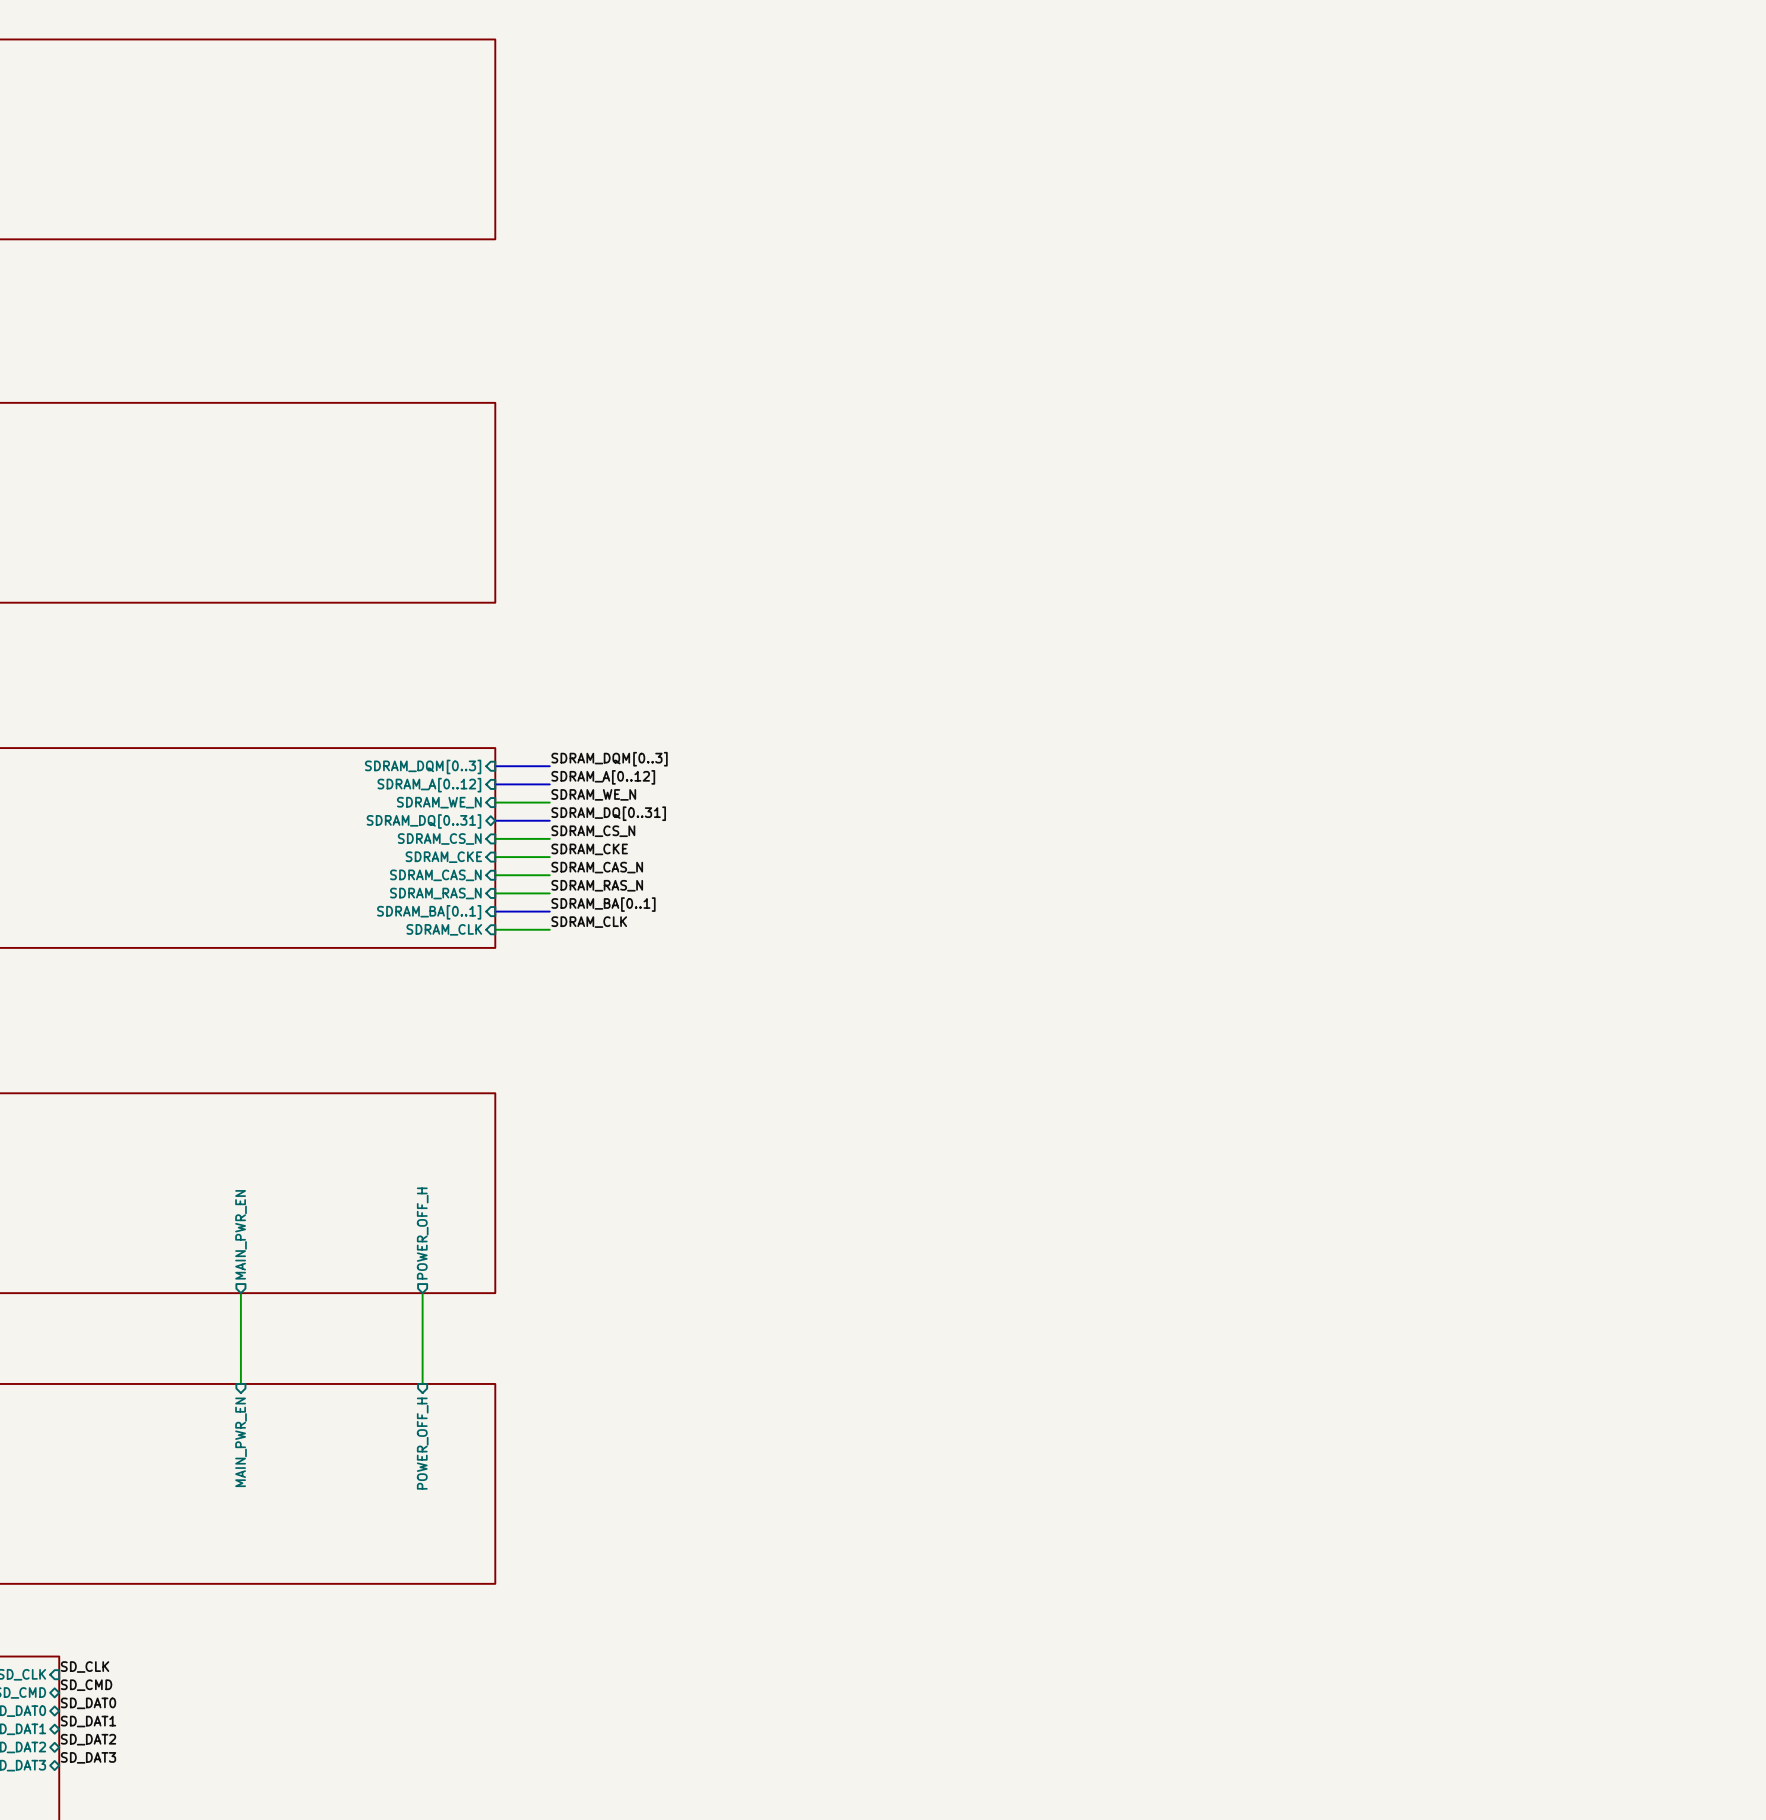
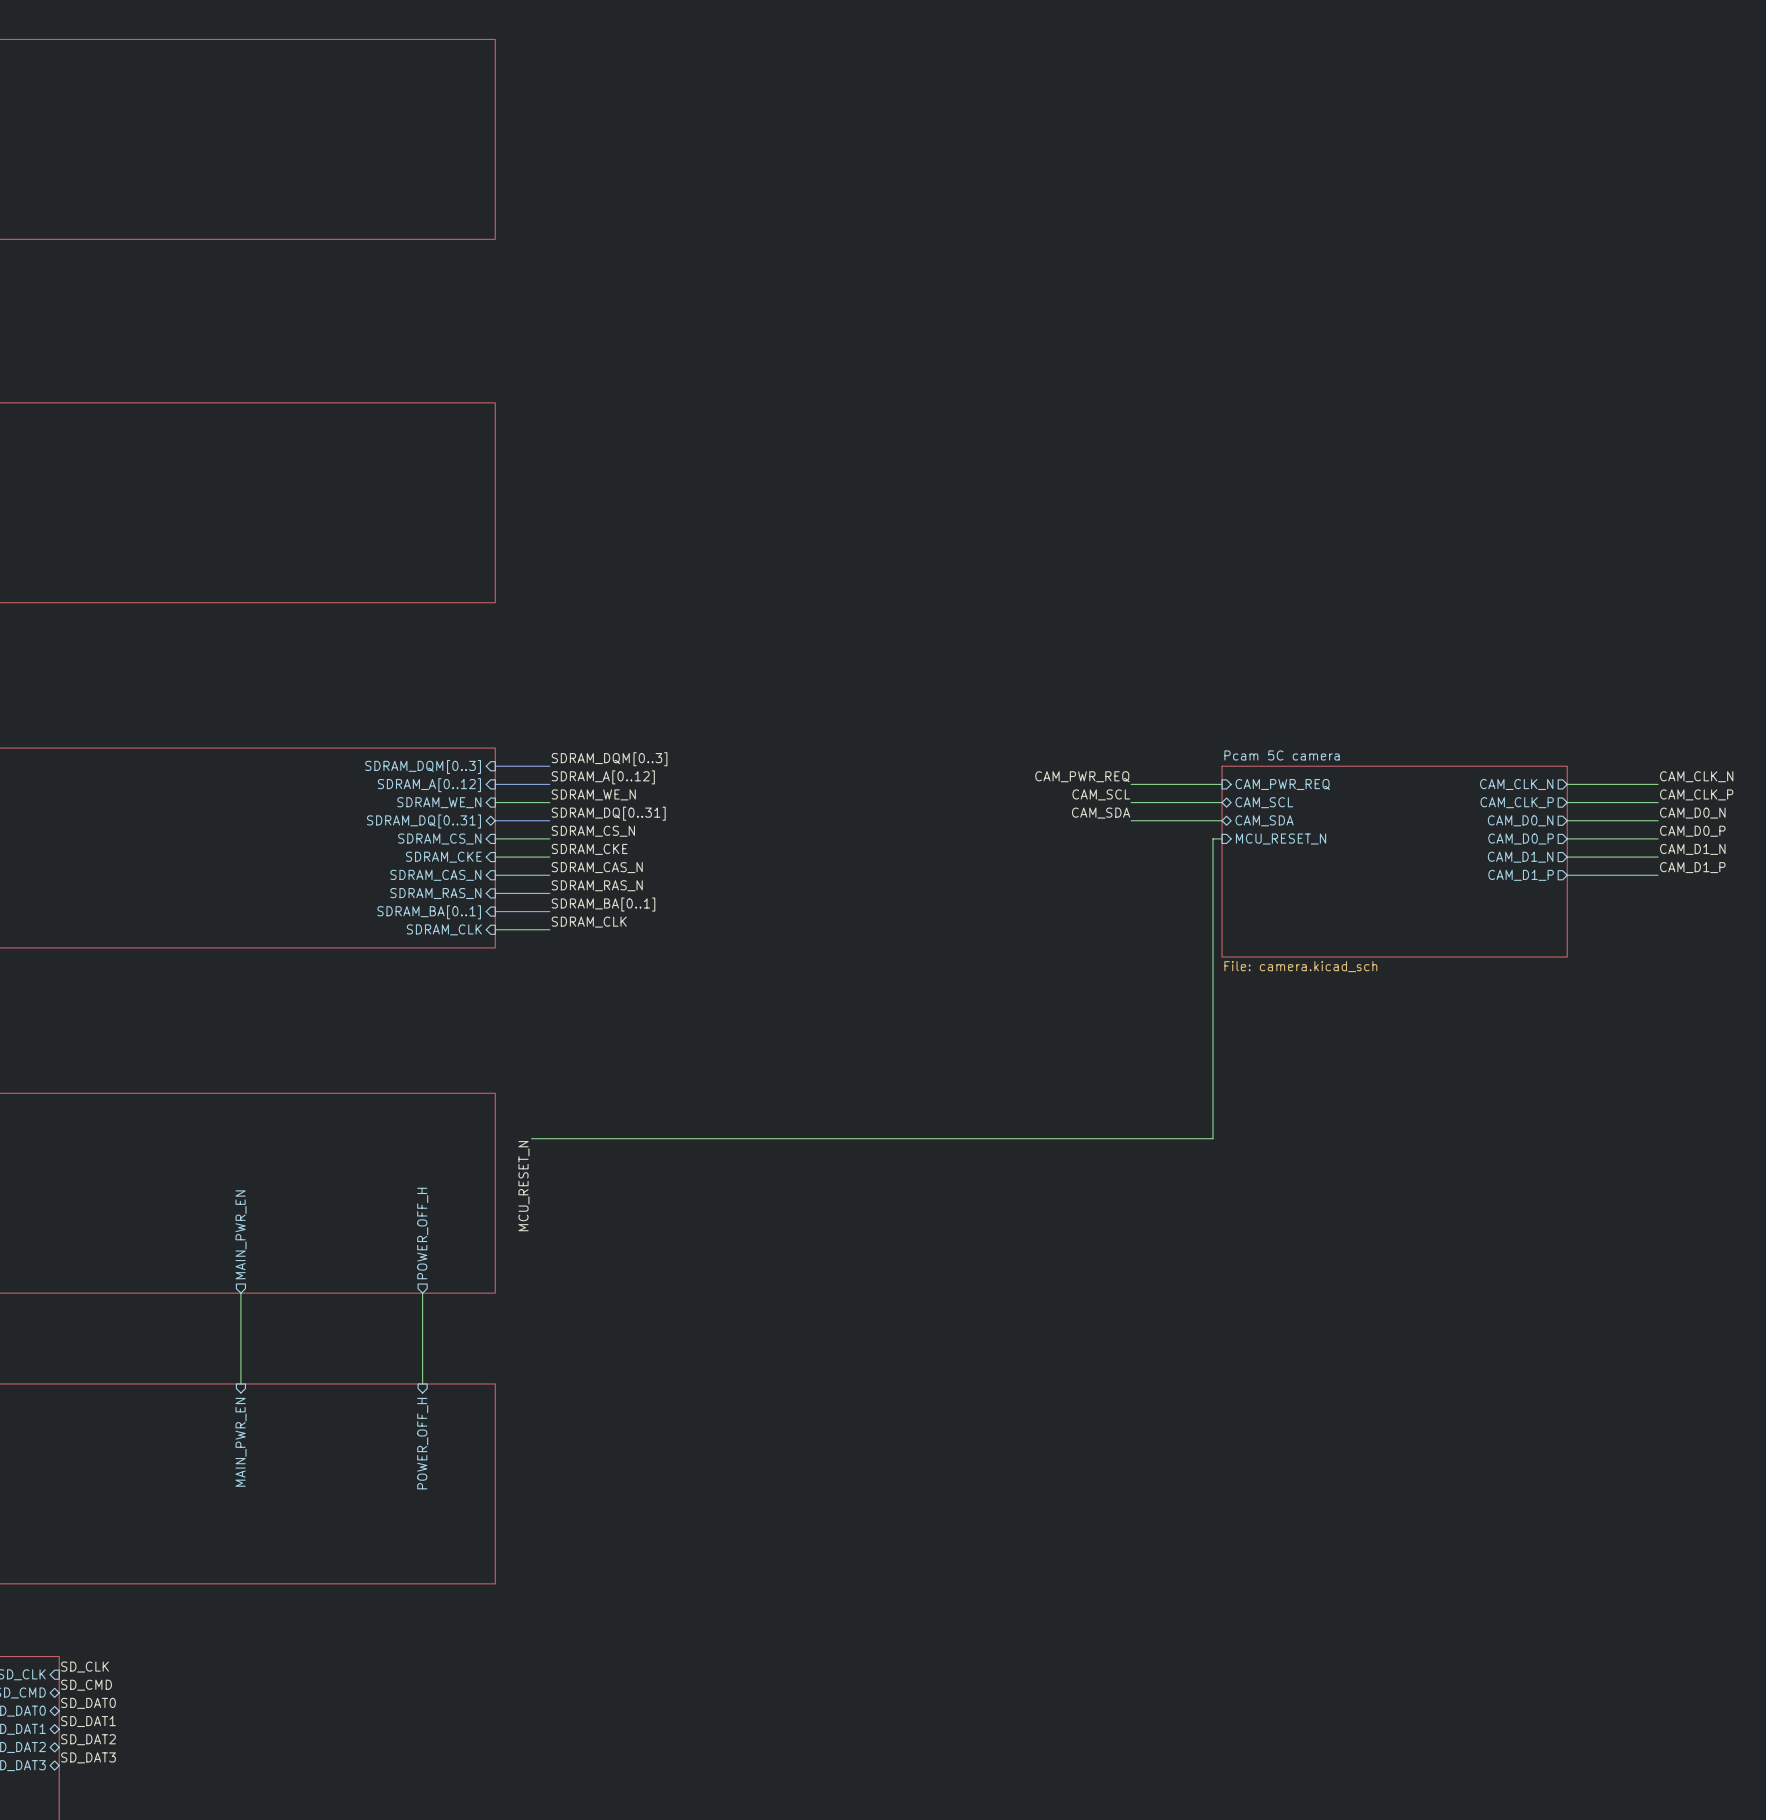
label: none -> CAM_PWR_REQ (1082, 776)
label: none -> CAM_CLK_N (1696, 776)
wire: none -> (1131, 784) (1222, 784)
sheet pin: none -> CAM_PWR_REQ (1282, 784)
sheet pin: none -> CAM_CLK_N (1516, 784)
wire: none -> (1567, 784) (1658, 784)
label: none -> CAM_SCL (1101, 794)
label: none -> CAM_CLK_P (1696, 794)
wire: none -> (1131, 802) (1222, 802)
sheet pin: none -> CAM_SCL (1264, 802)
sheet pin: none -> CAM_CLK_P (1517, 802)
wire: none -> (1567, 802) (1658, 802)
label: none -> CAM_SDA (1101, 813)
label: none -> CAM_D0_N (1692, 813)
wire: none -> (1131, 820) (1222, 820)
sheet pin: none -> CAM_SDA (1264, 820)
sheet pin: none -> CAM_D0_N (1520, 820)
wire: none -> (1567, 820) (1658, 820)
label: none -> CAM_D0_P (1692, 831)
wire: none -> (1222, 838) (1212, 838) (1212, 1138) (531, 1138)
wire: none -> (1567, 838) (1658, 838)
sheet pin: none -> MCU_RESET_N (1281, 839)
sheet pin: none -> CAM_D0_P (1521, 839)
label: none -> CAM_D1_N (1692, 849)
sheet pin: none -> CAM_D1_N (1520, 857)
wire: none -> (1567, 857) (1658, 857)
sheet Pcam 5C camera: none -> File: camera.kicad_sch (1394, 861)
label: none -> CAM_D1_P (1692, 867)
sheet pin: none -> CAM_D1_P (1521, 875)
wire: none -> (1567, 875) (1658, 875)
label: none -> MCU_RESET_N (523, 1186)

